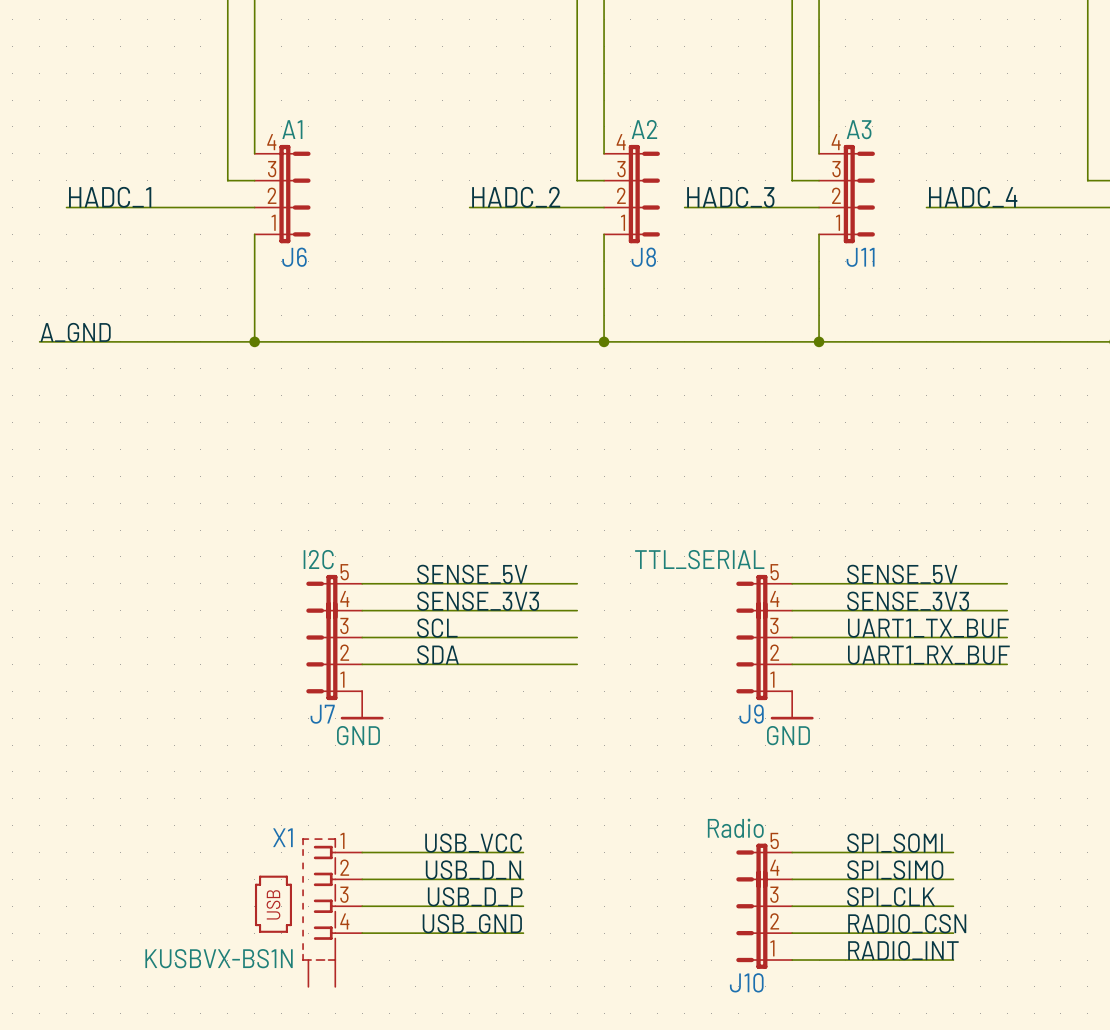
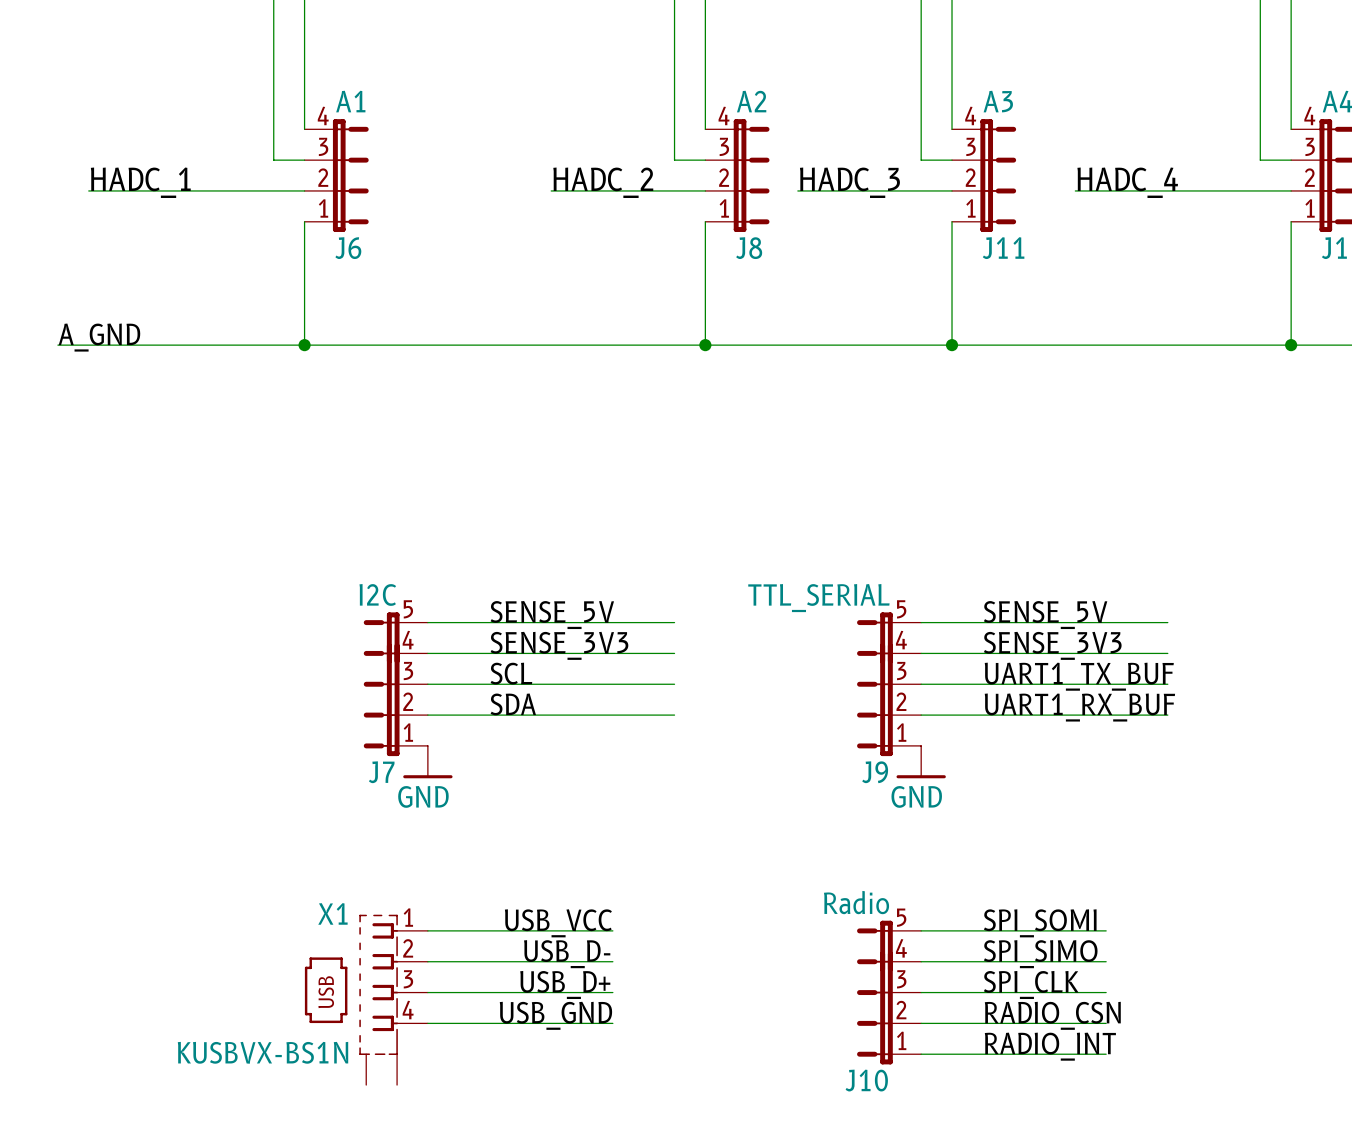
label: USB_D_N (473, 869) -> USB_D- (567, 954)
label: USB_D_P (475, 896) -> USB_D+ (565, 985)

